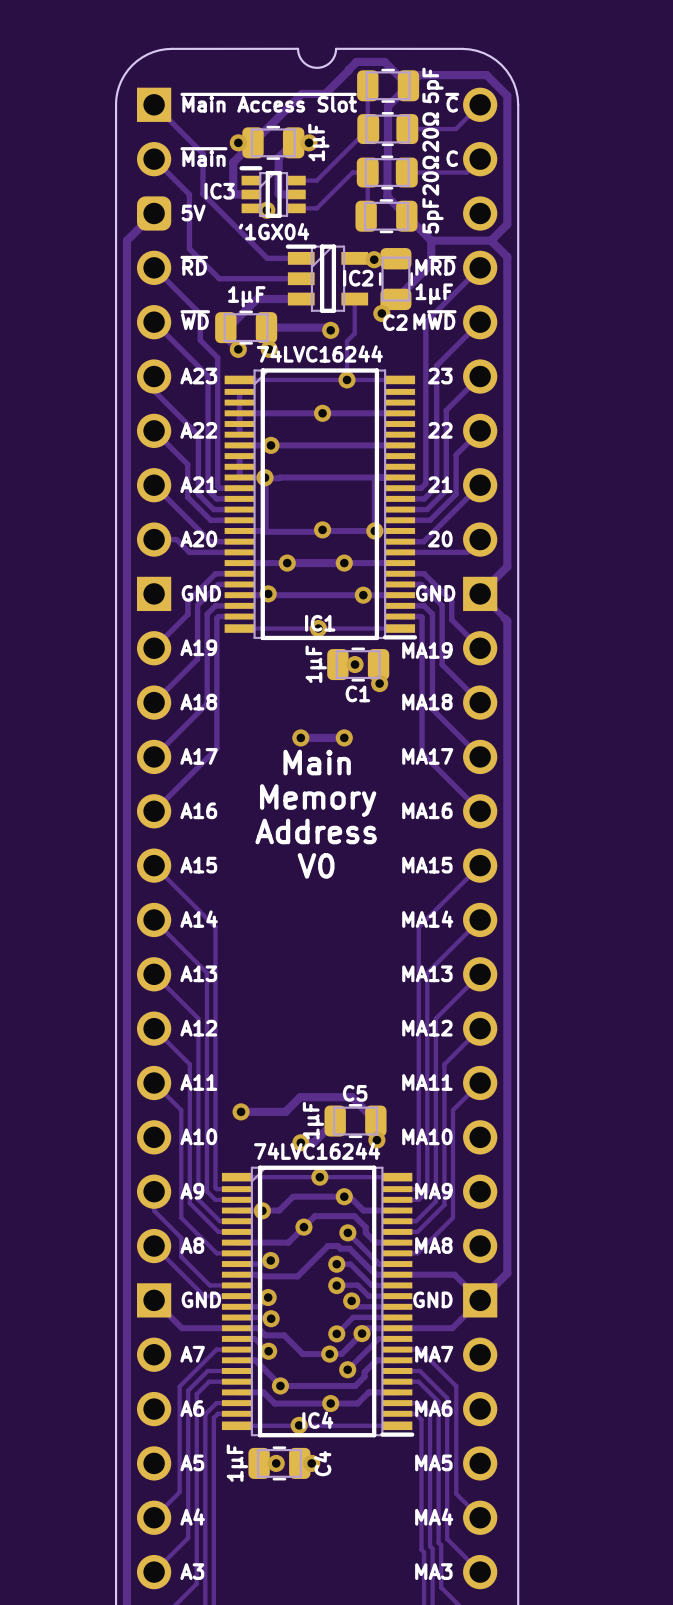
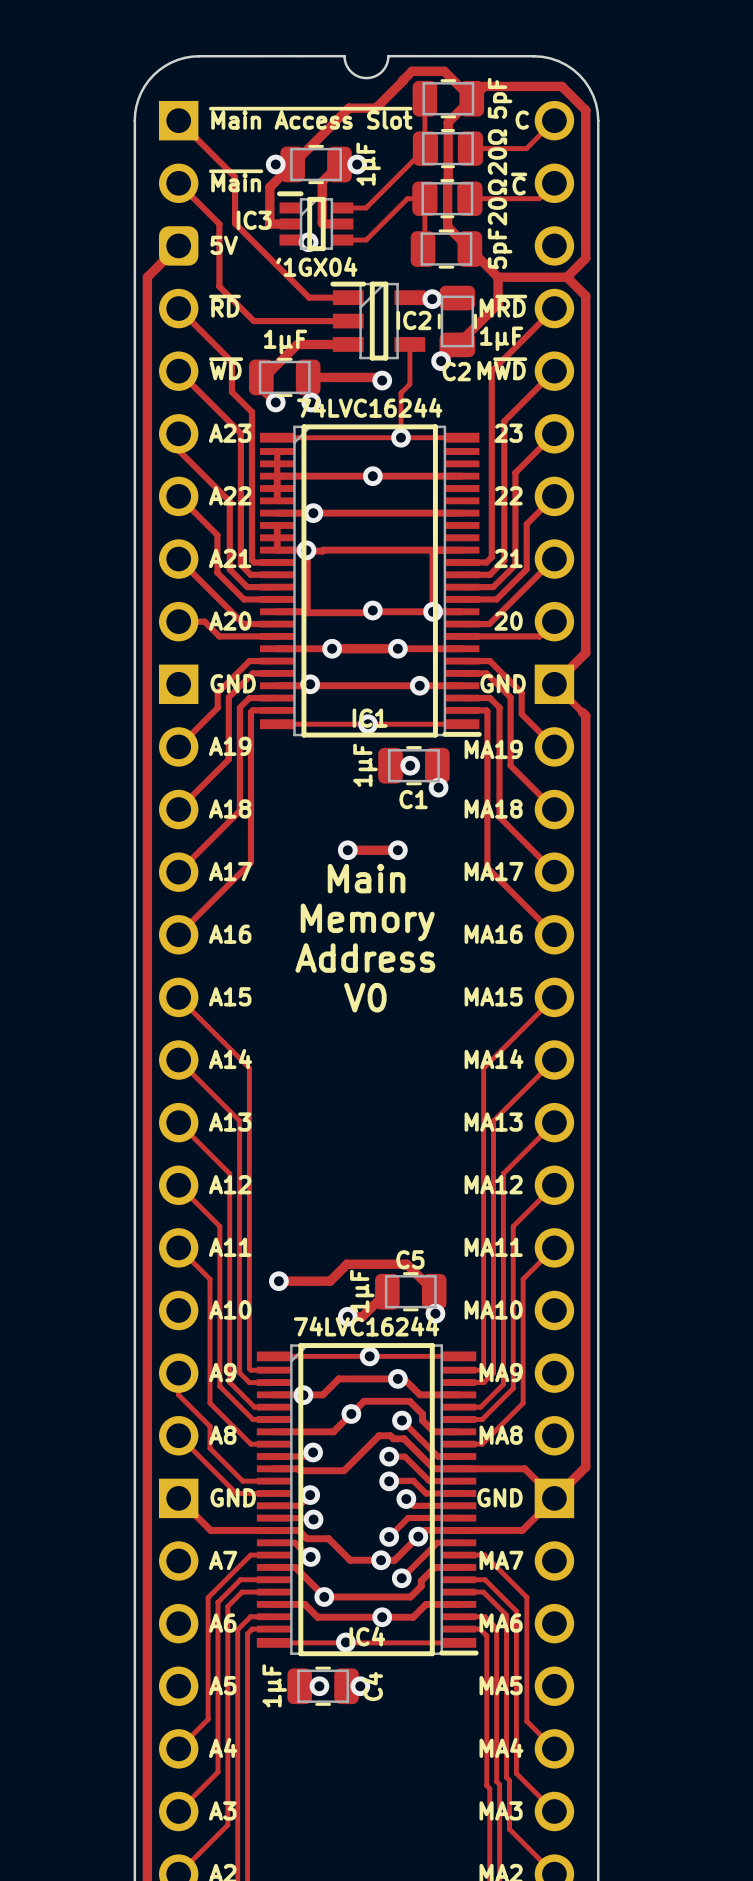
text: ~{C} (452, 102) -> C (522, 120)
text: C (452, 158) -> ~{C} (519, 184)

